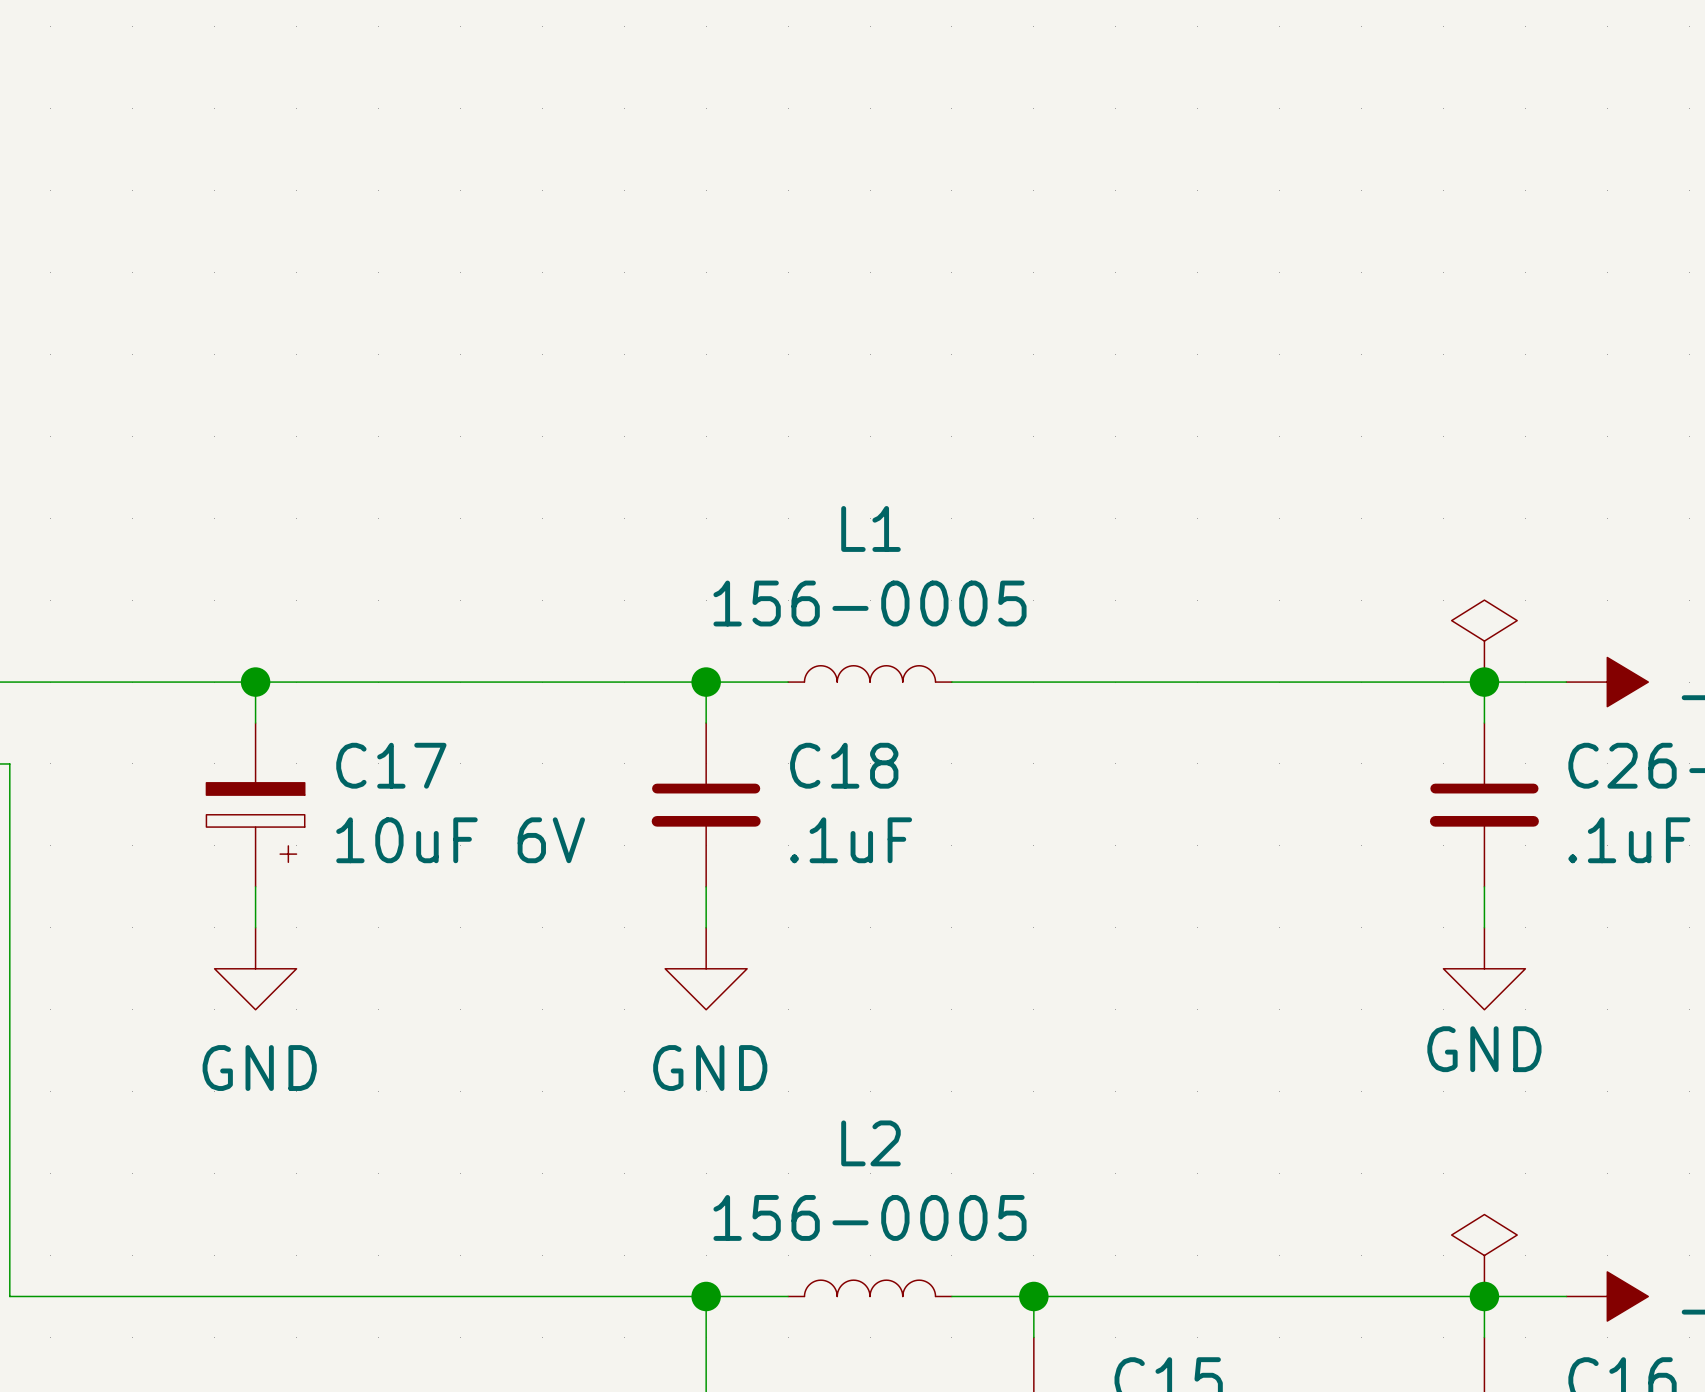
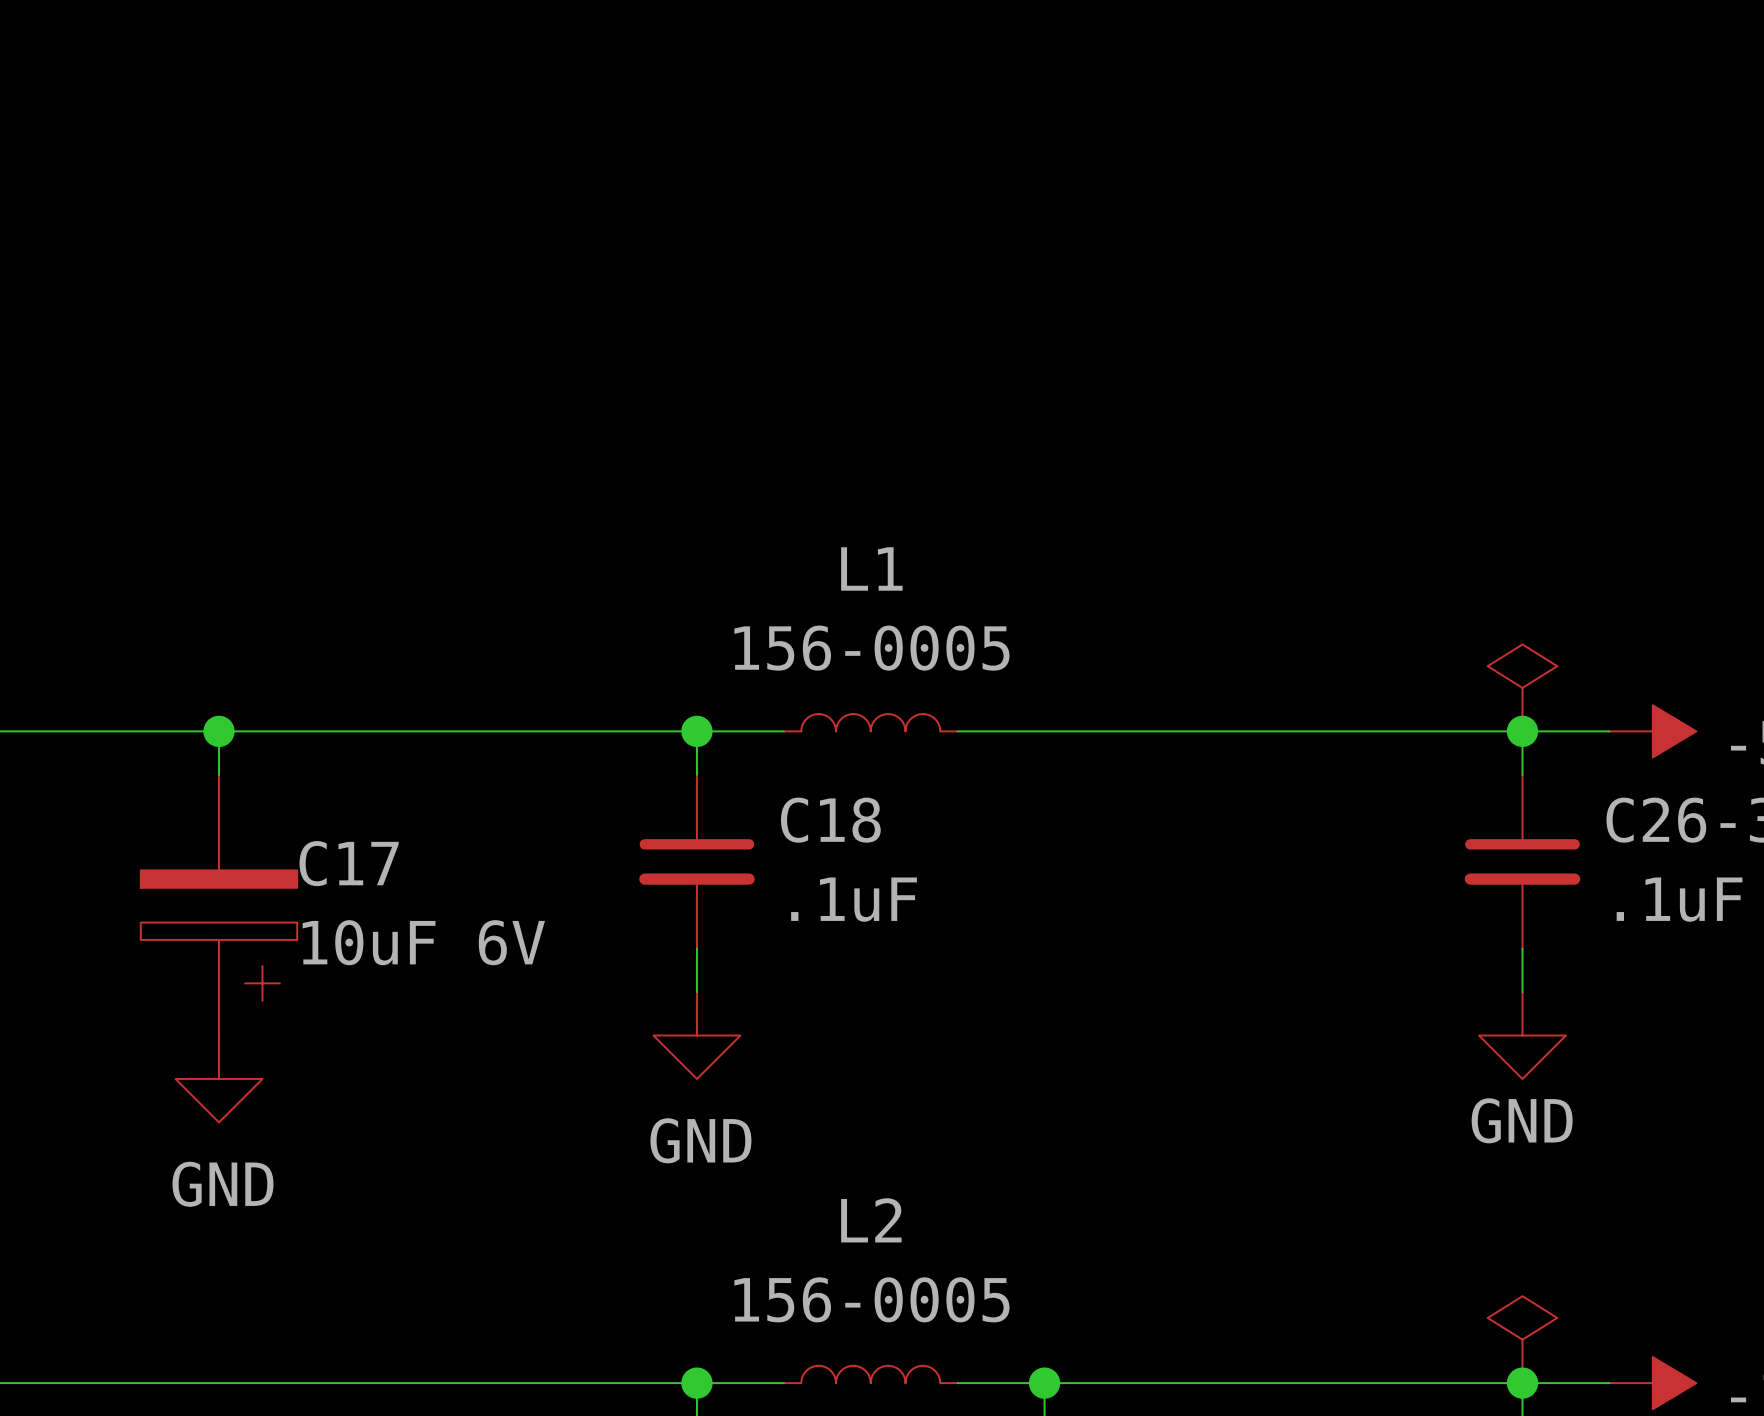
C17 symbol: [206, 723, 305, 887] -> [140, 774, 298, 1036]
power symbol position: GND (255, 968) -> GND (219, 1078)

